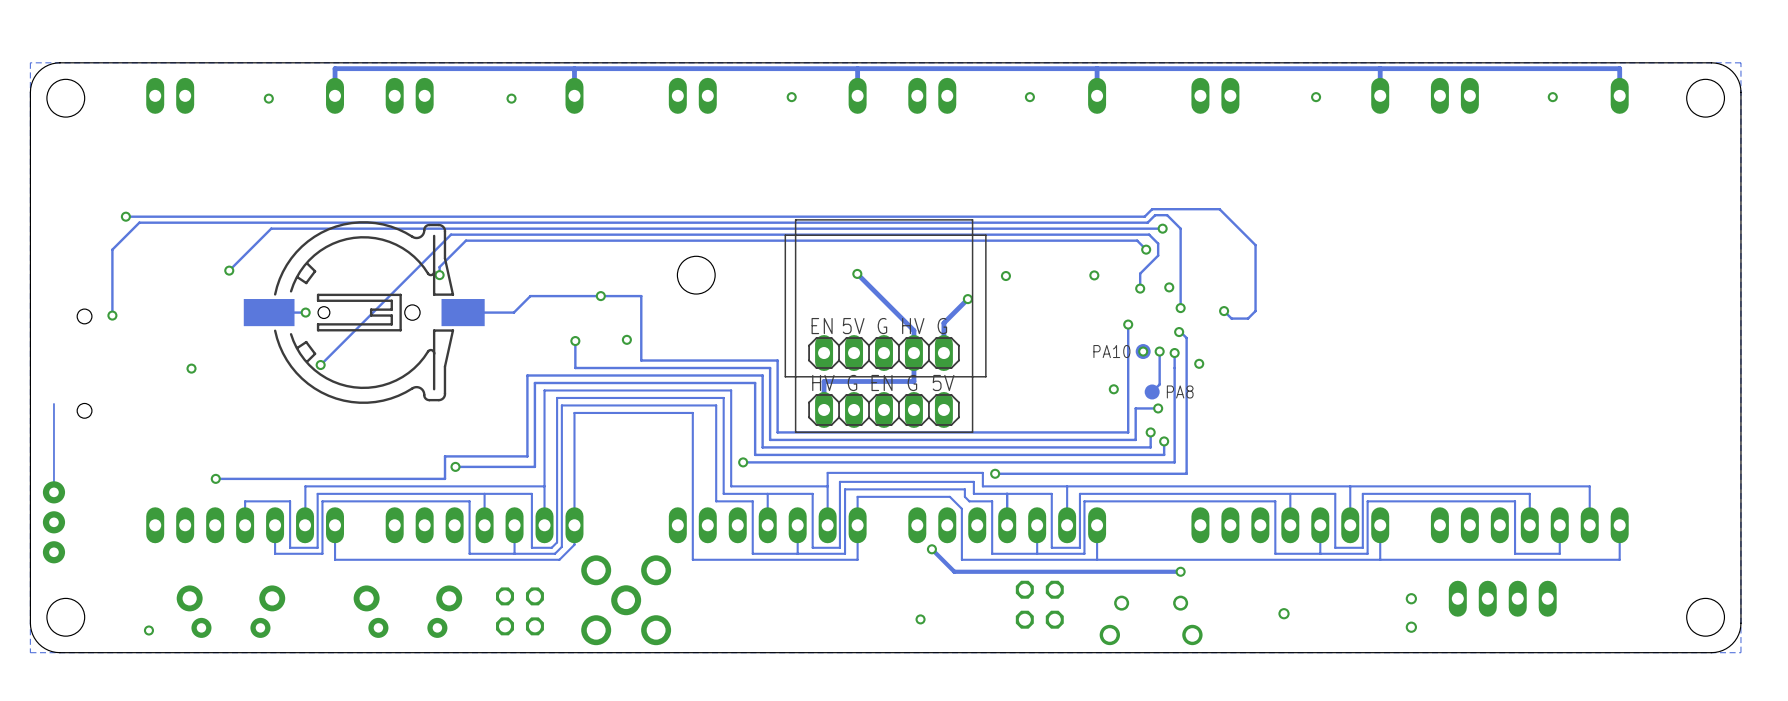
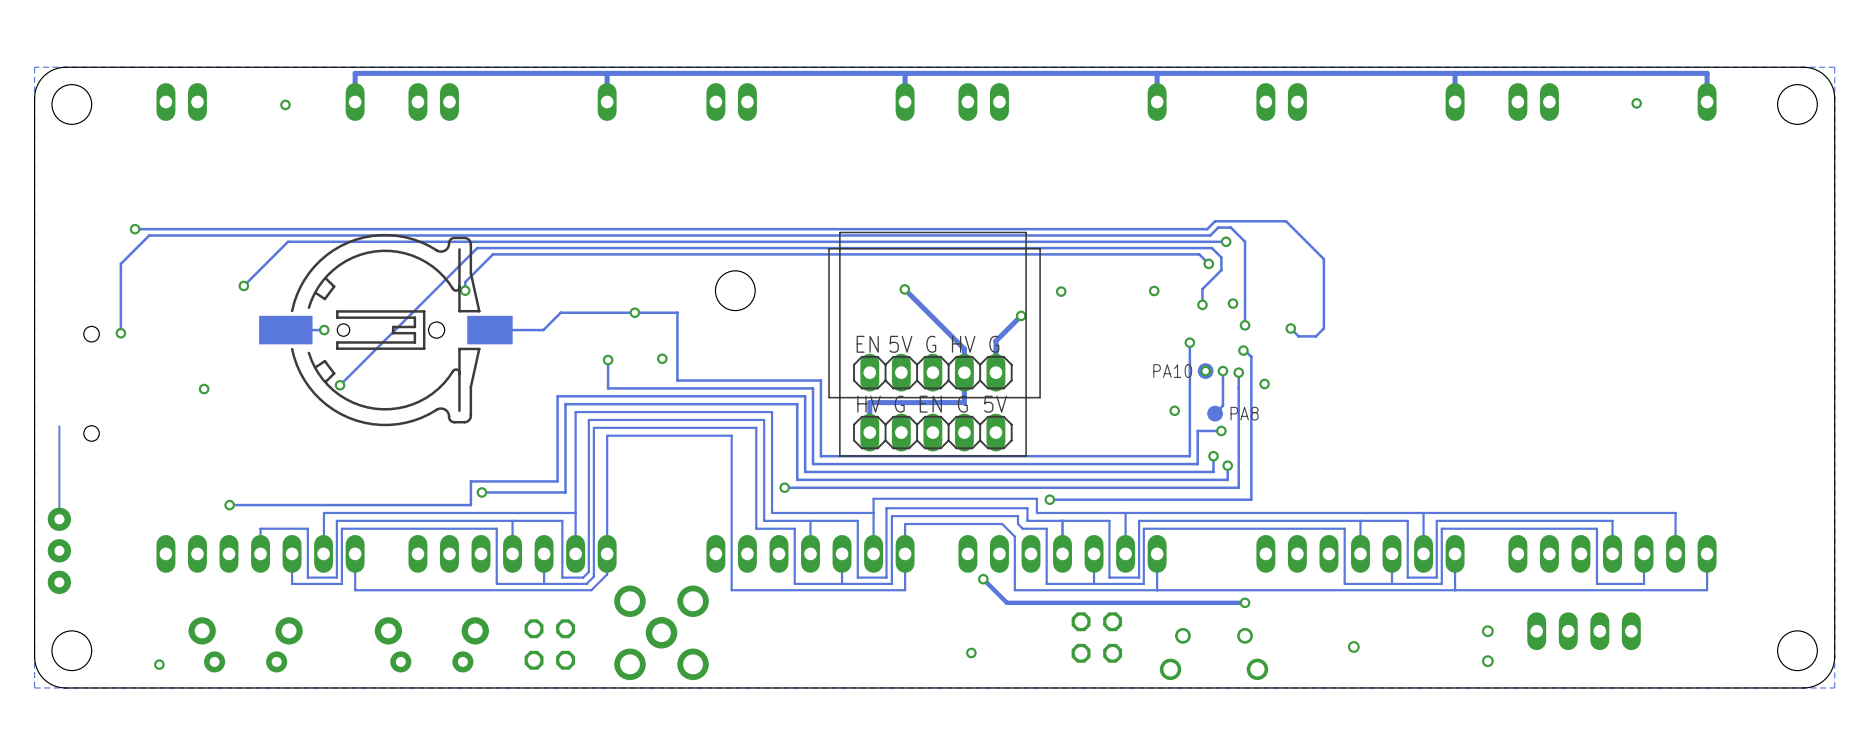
via: (791, 97) -> none
via: (1029, 97) -> none
via: (1316, 97) -> none
via: (511, 98) -> none

